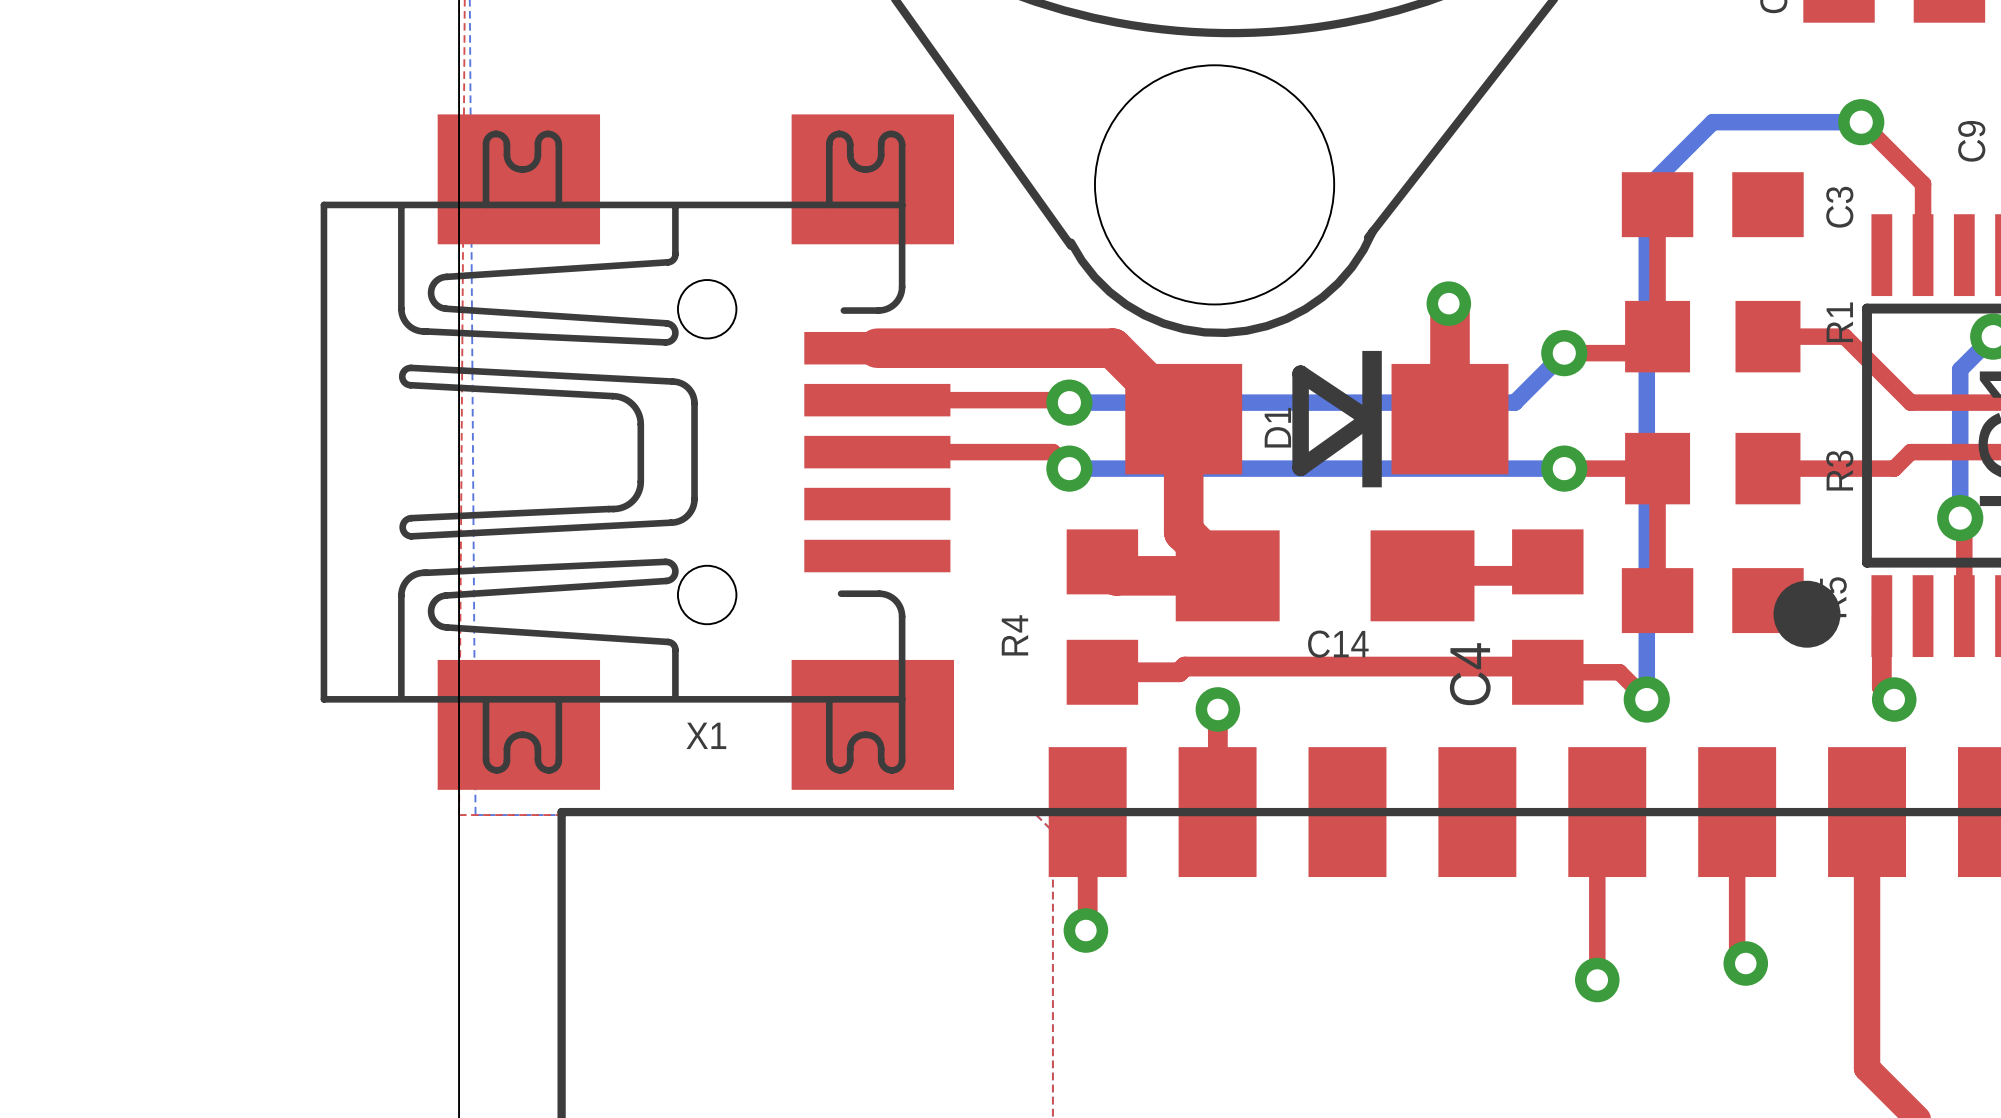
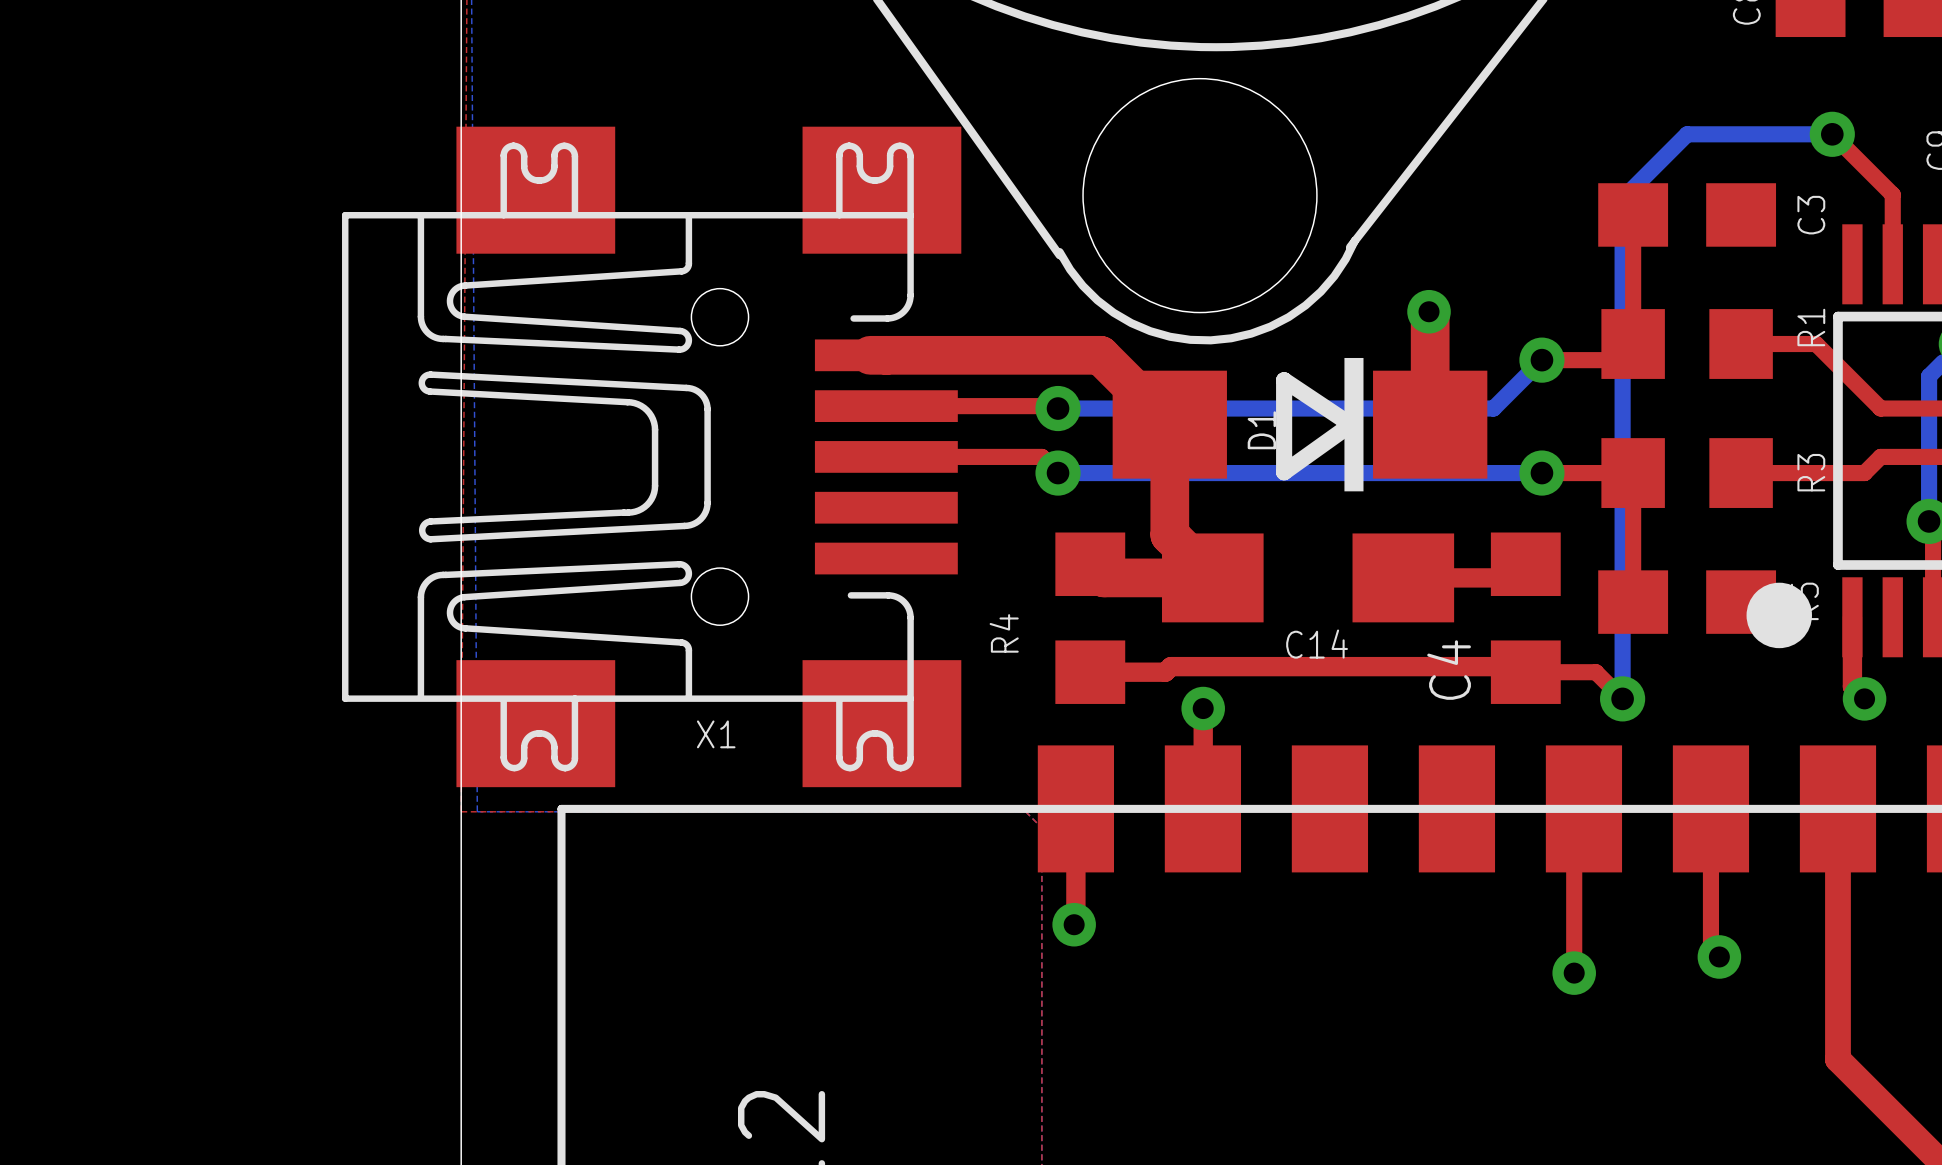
X1 position: (637, 452) -> (651, 456)

